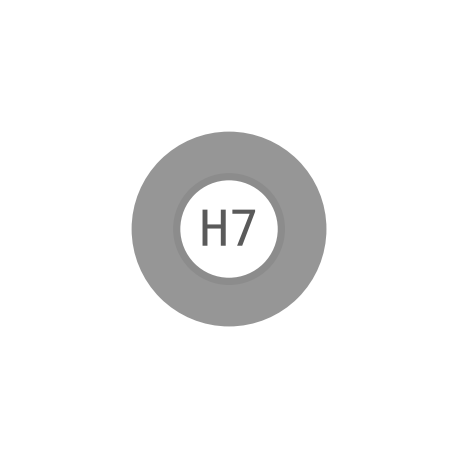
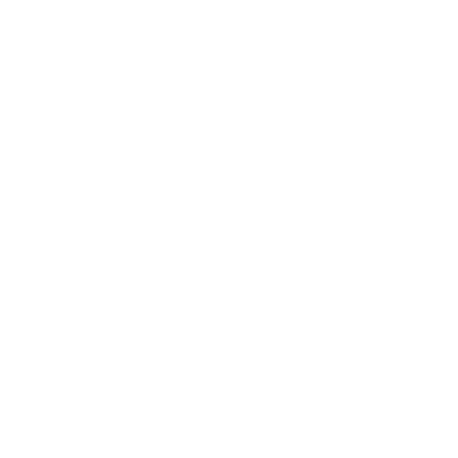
H7: (229, 229) -> none

